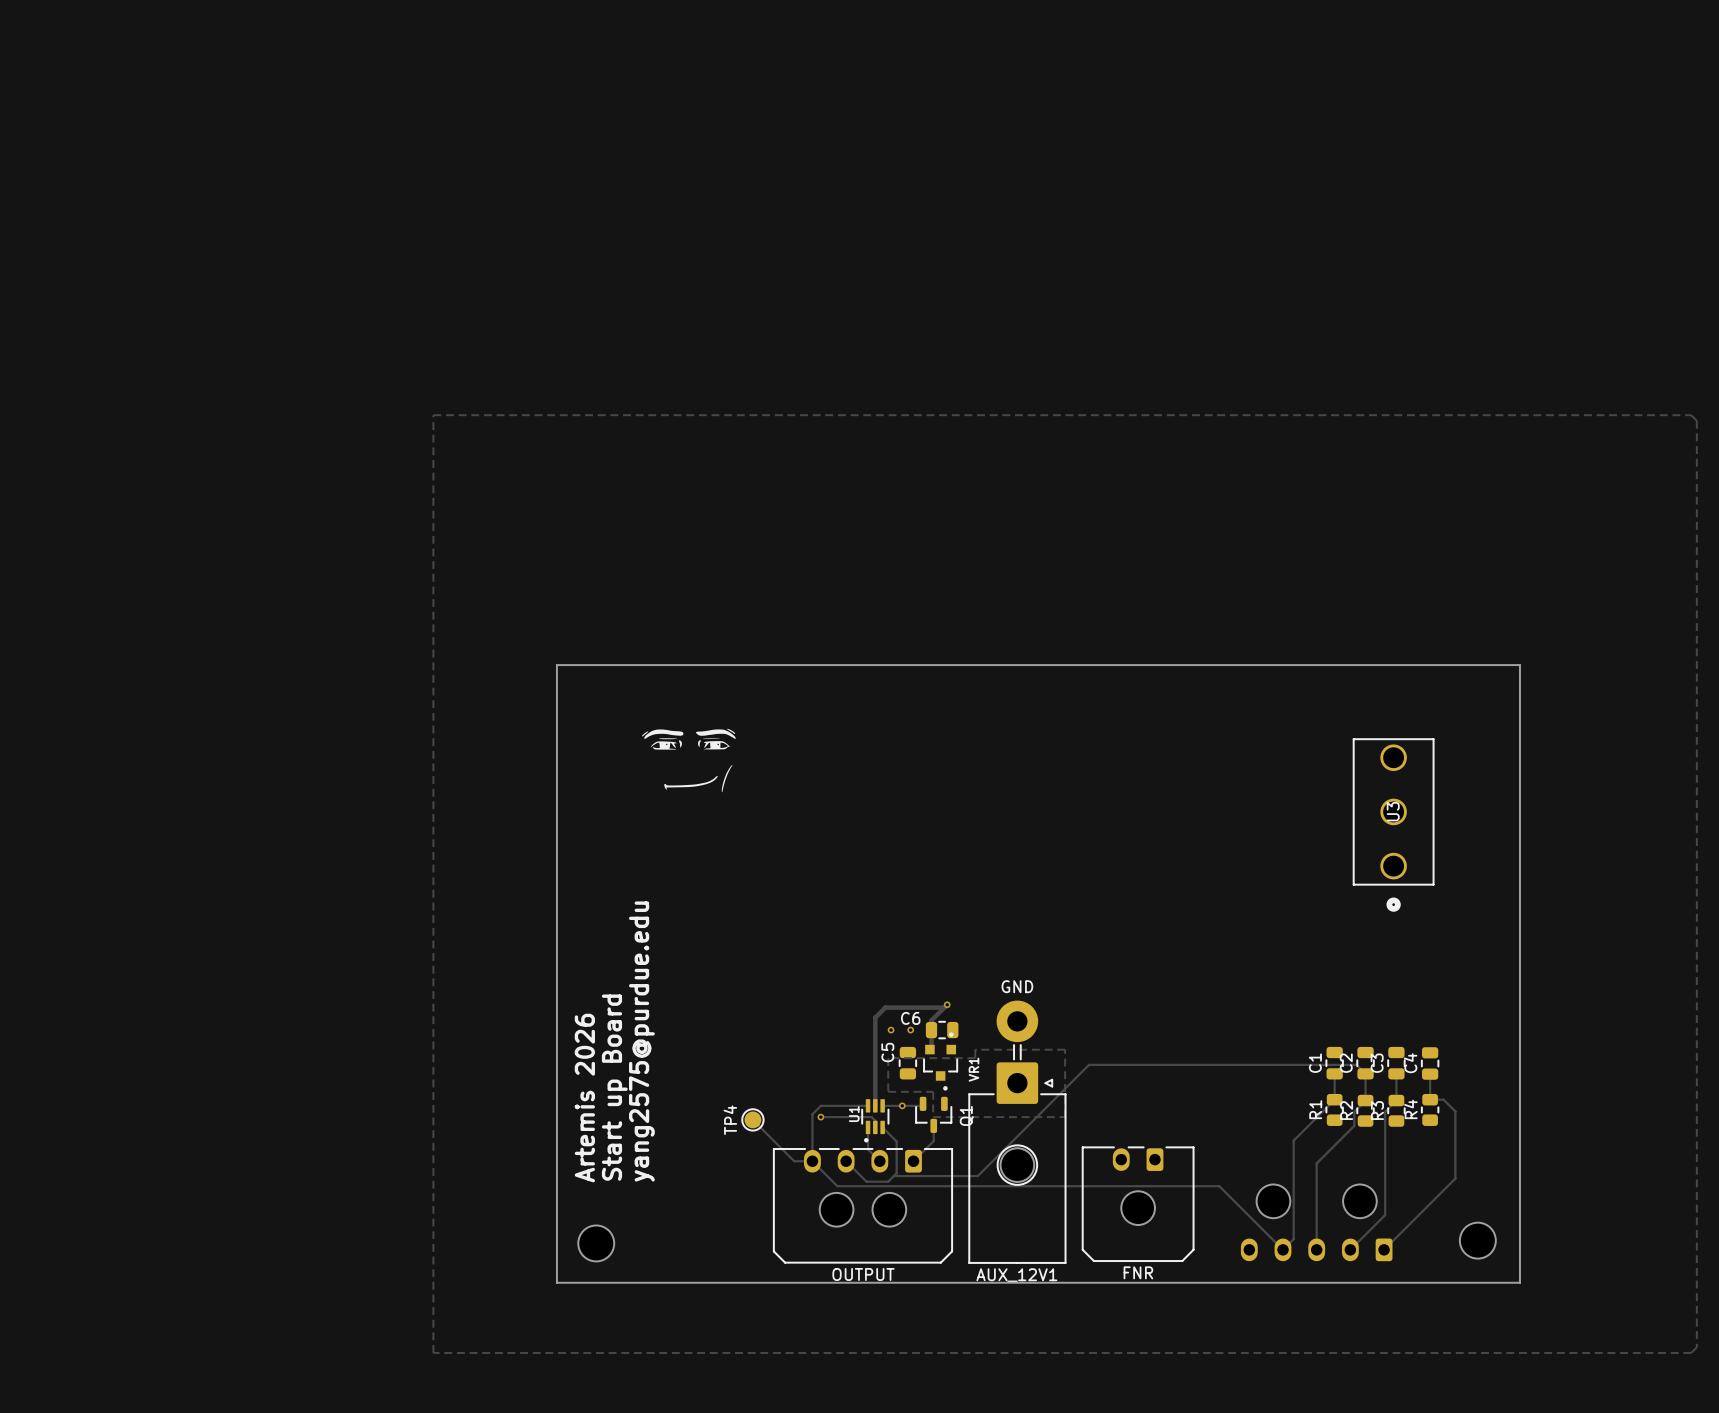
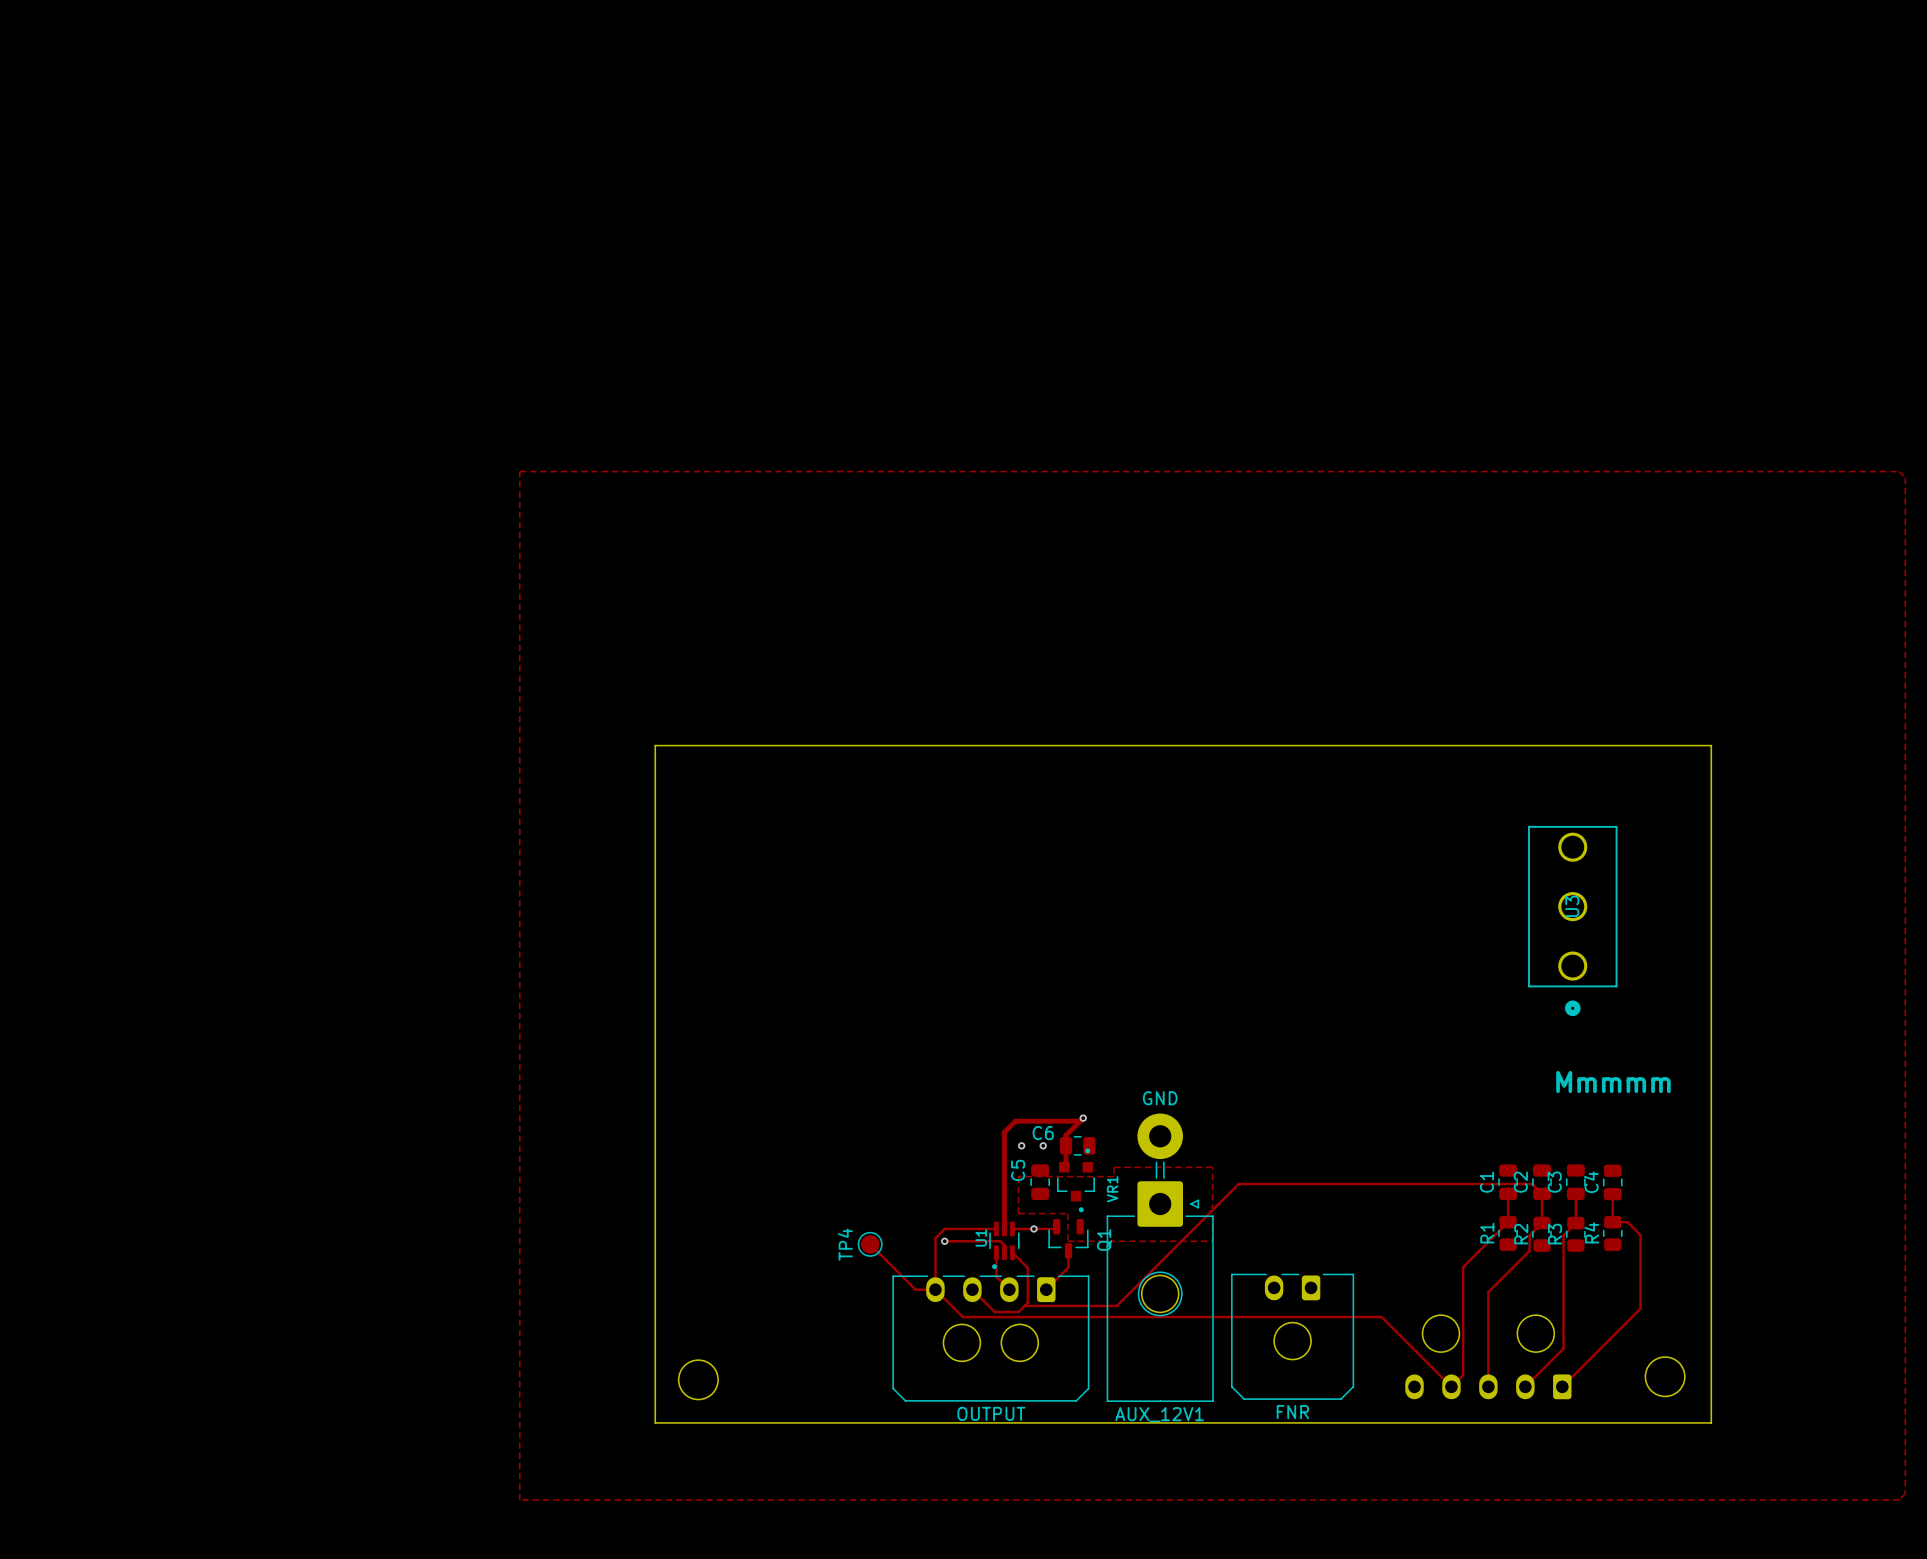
drawing: [642, 728, 736, 793] -> none
text: none -> Mmmmm (1613, 1082)
text: yang2575@purdue.edu (641, 1041) -> none
text: Start up Board (614, 1087) -> none
text: Artemis 2026 (584, 1098) -> none

